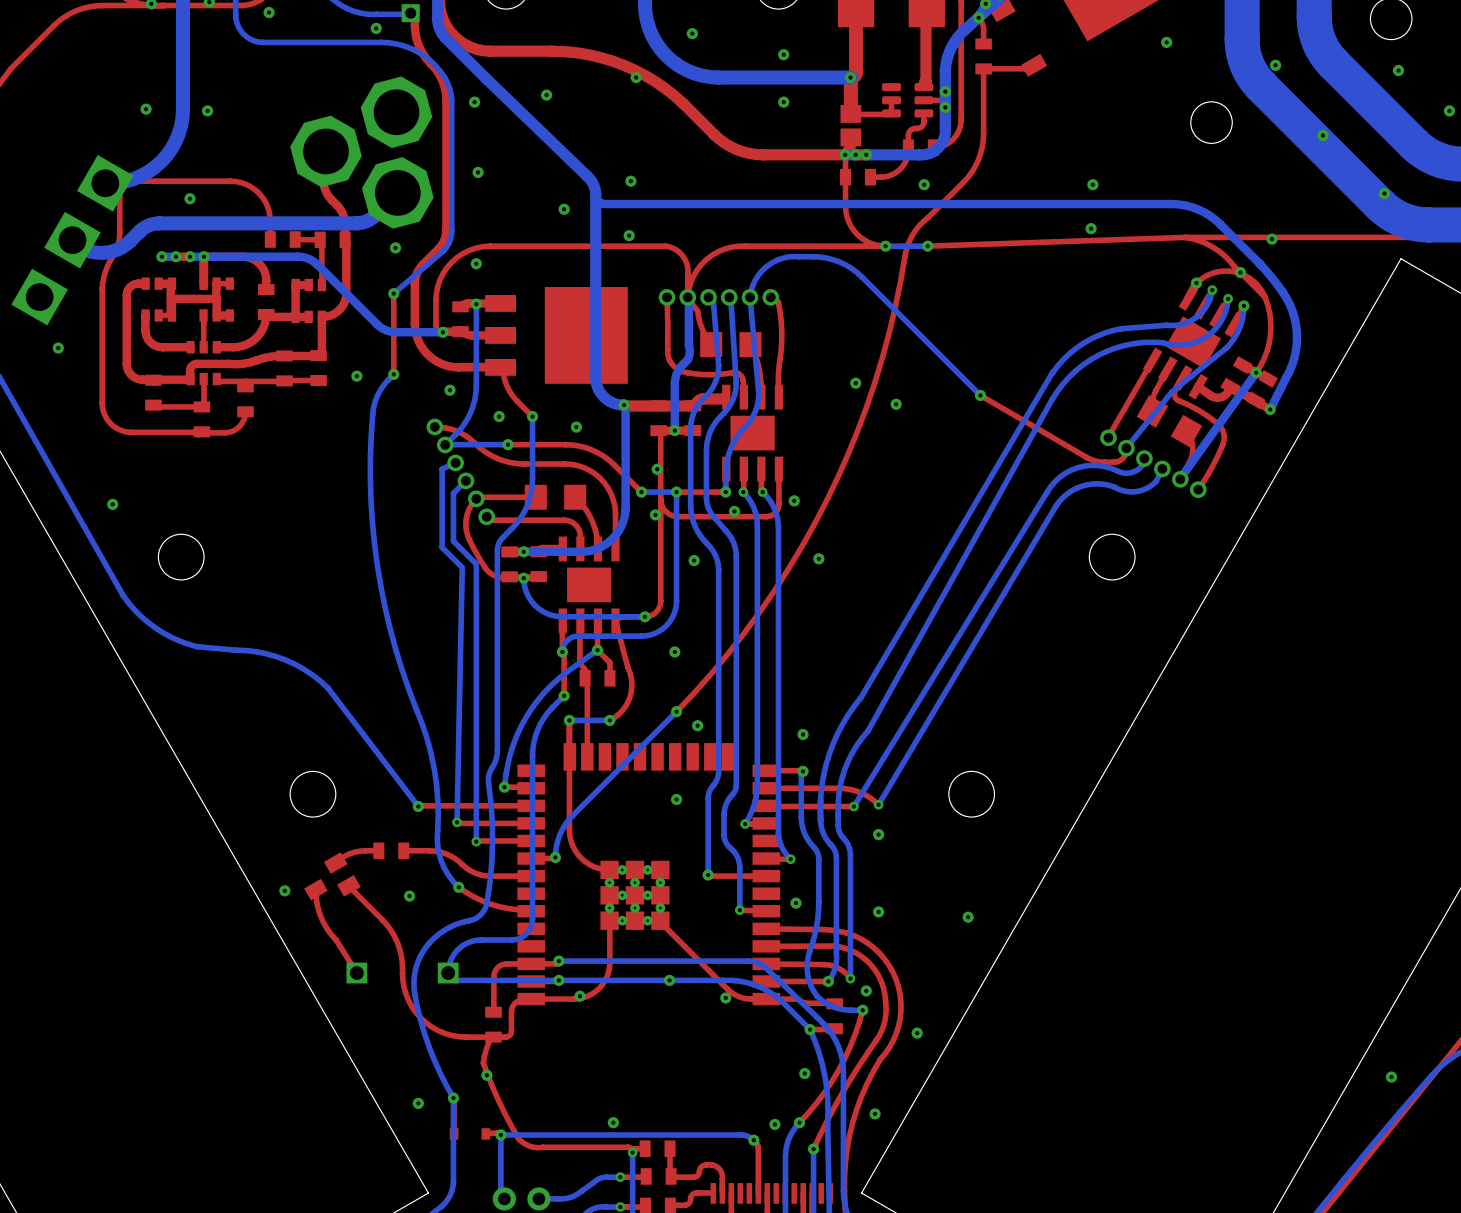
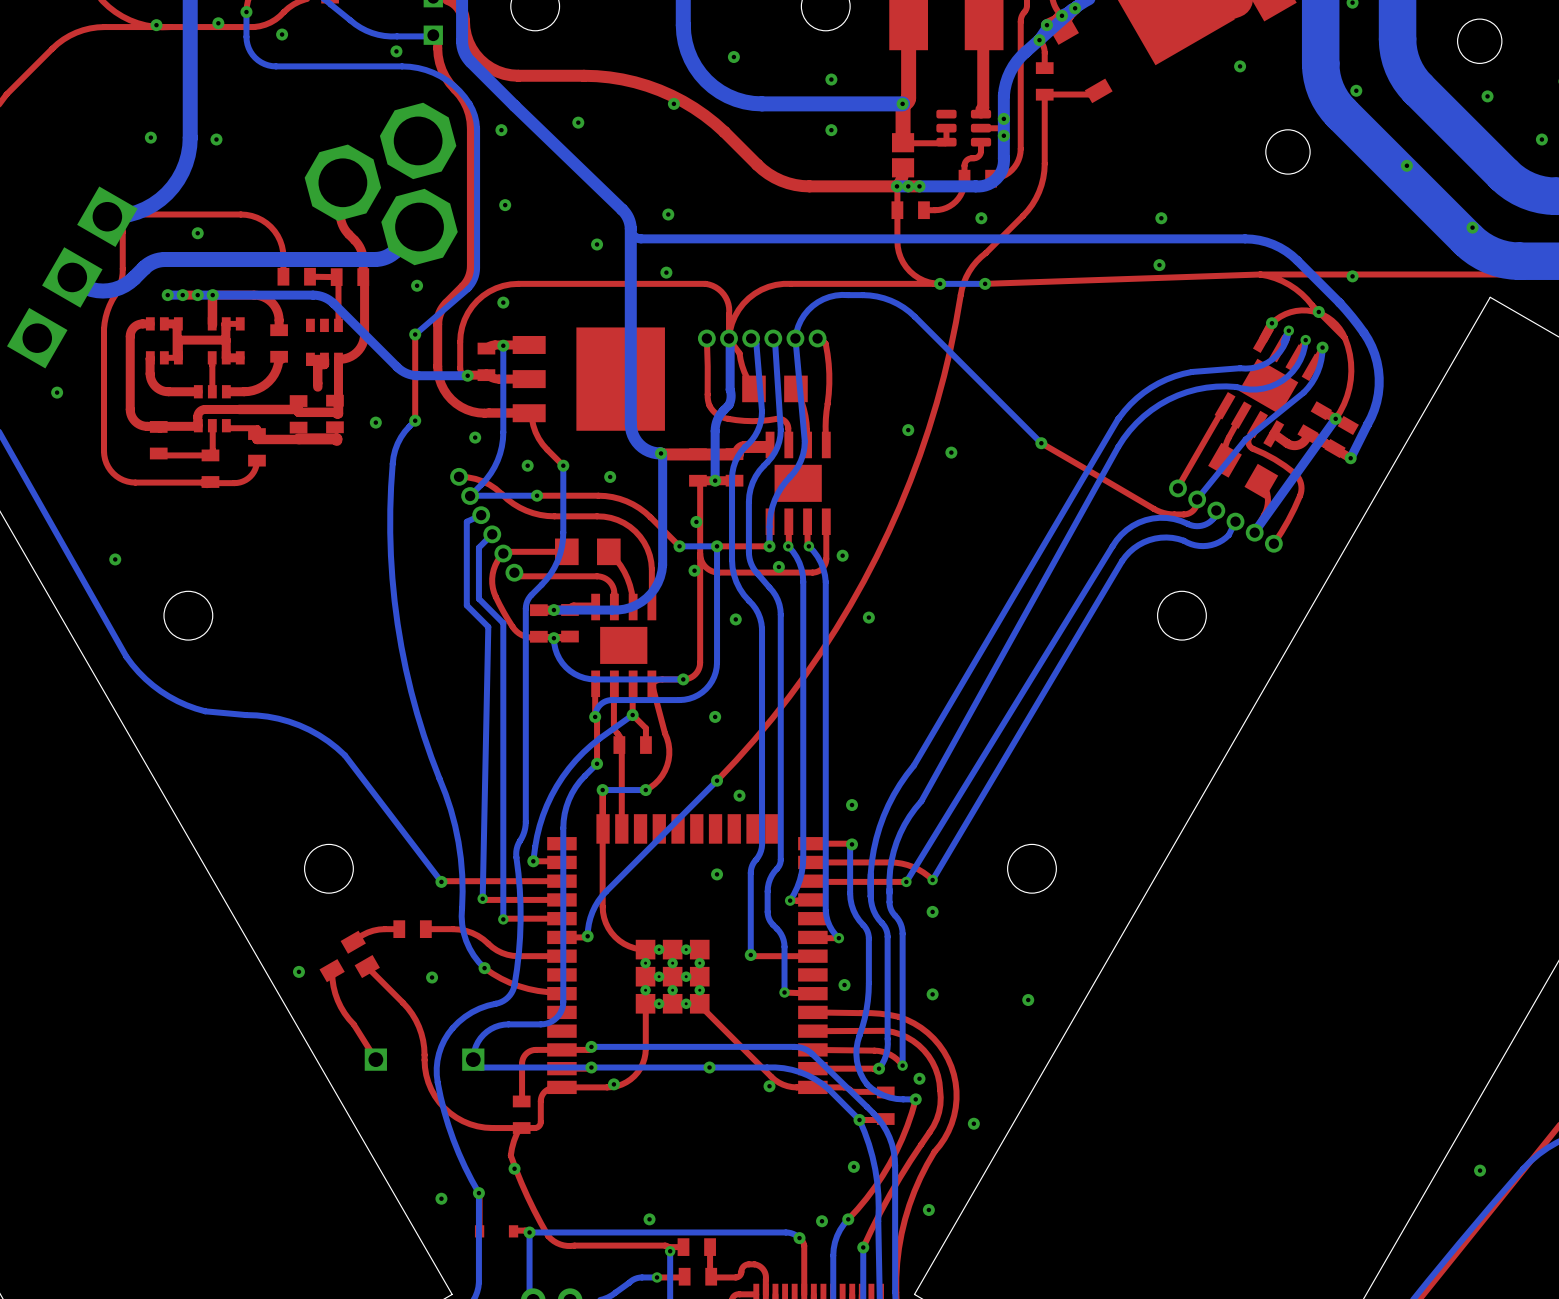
top track: (308, 285) (295, 285) (295, 316) (268, 316) -> none
top track: none -> (324, 359) (324, 364) (317, 364) (317, 386)
top track: (316, 355) (277, 356) (242, 363) (228, 363) -> (338, 398) (338, 413) (298, 412) (298, 409) (238, 409)
top track: (285, 380) (246, 381) -> none
top track: (318, 380) (285, 380) -> none
top track: none -> (256, 434) (256, 439) (336, 440)

